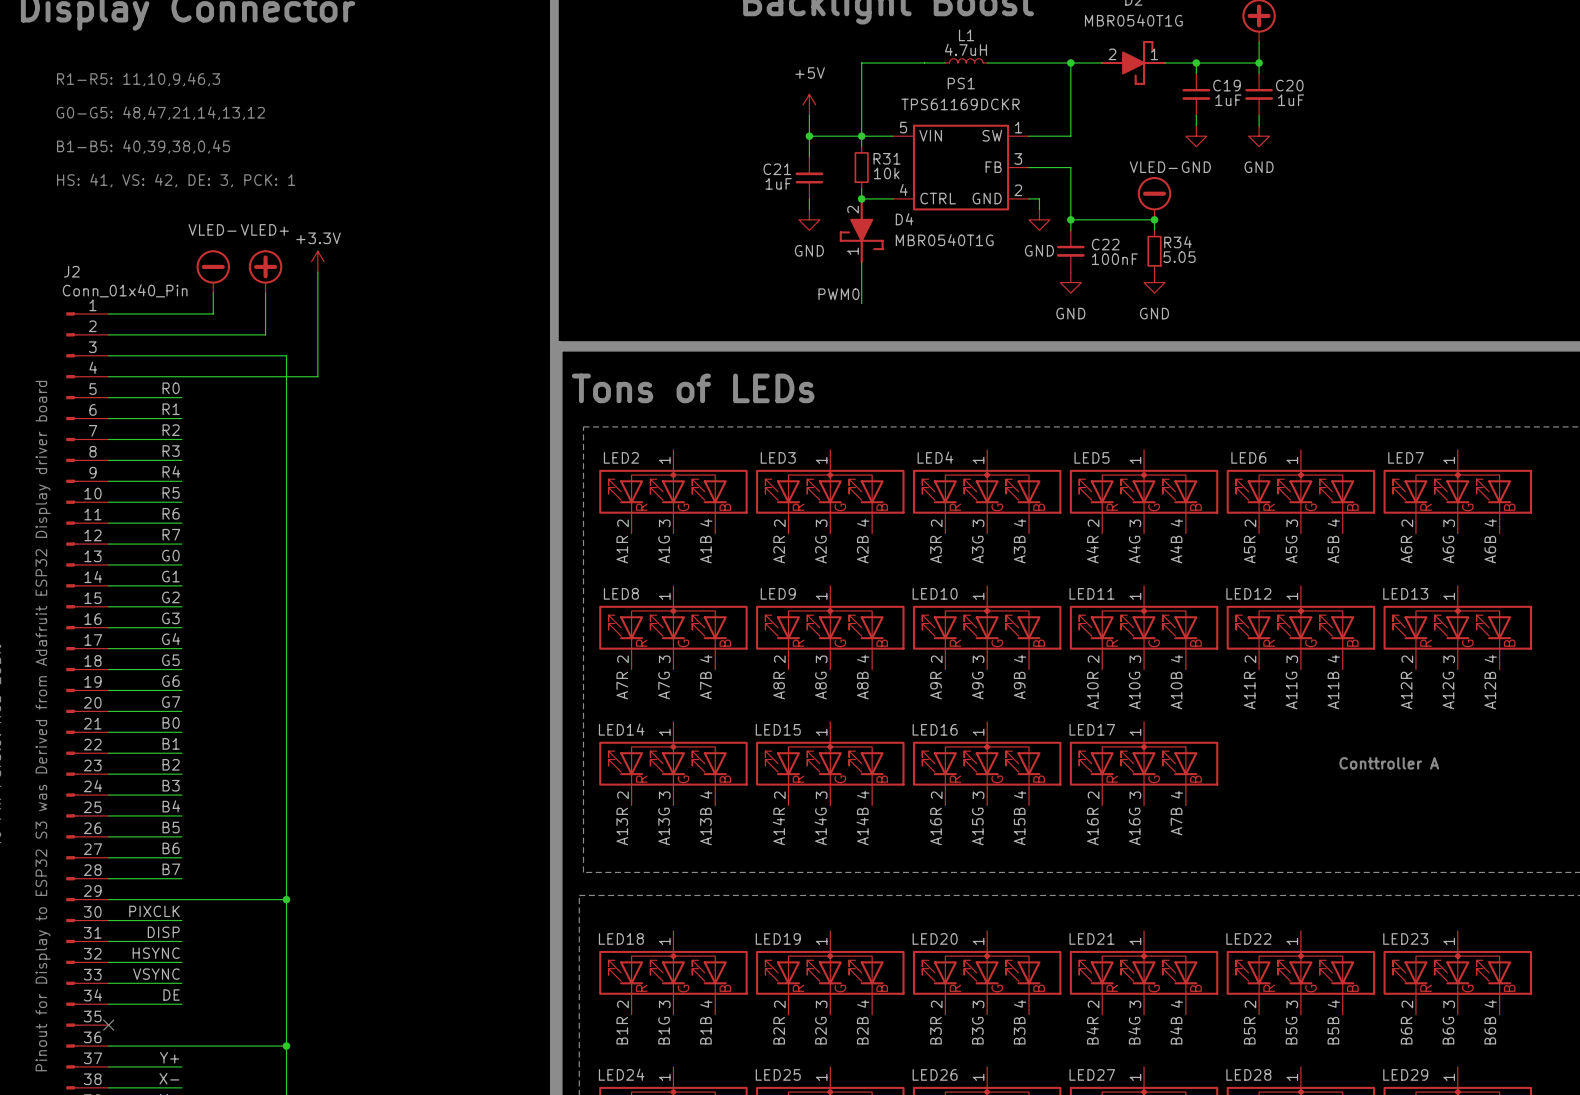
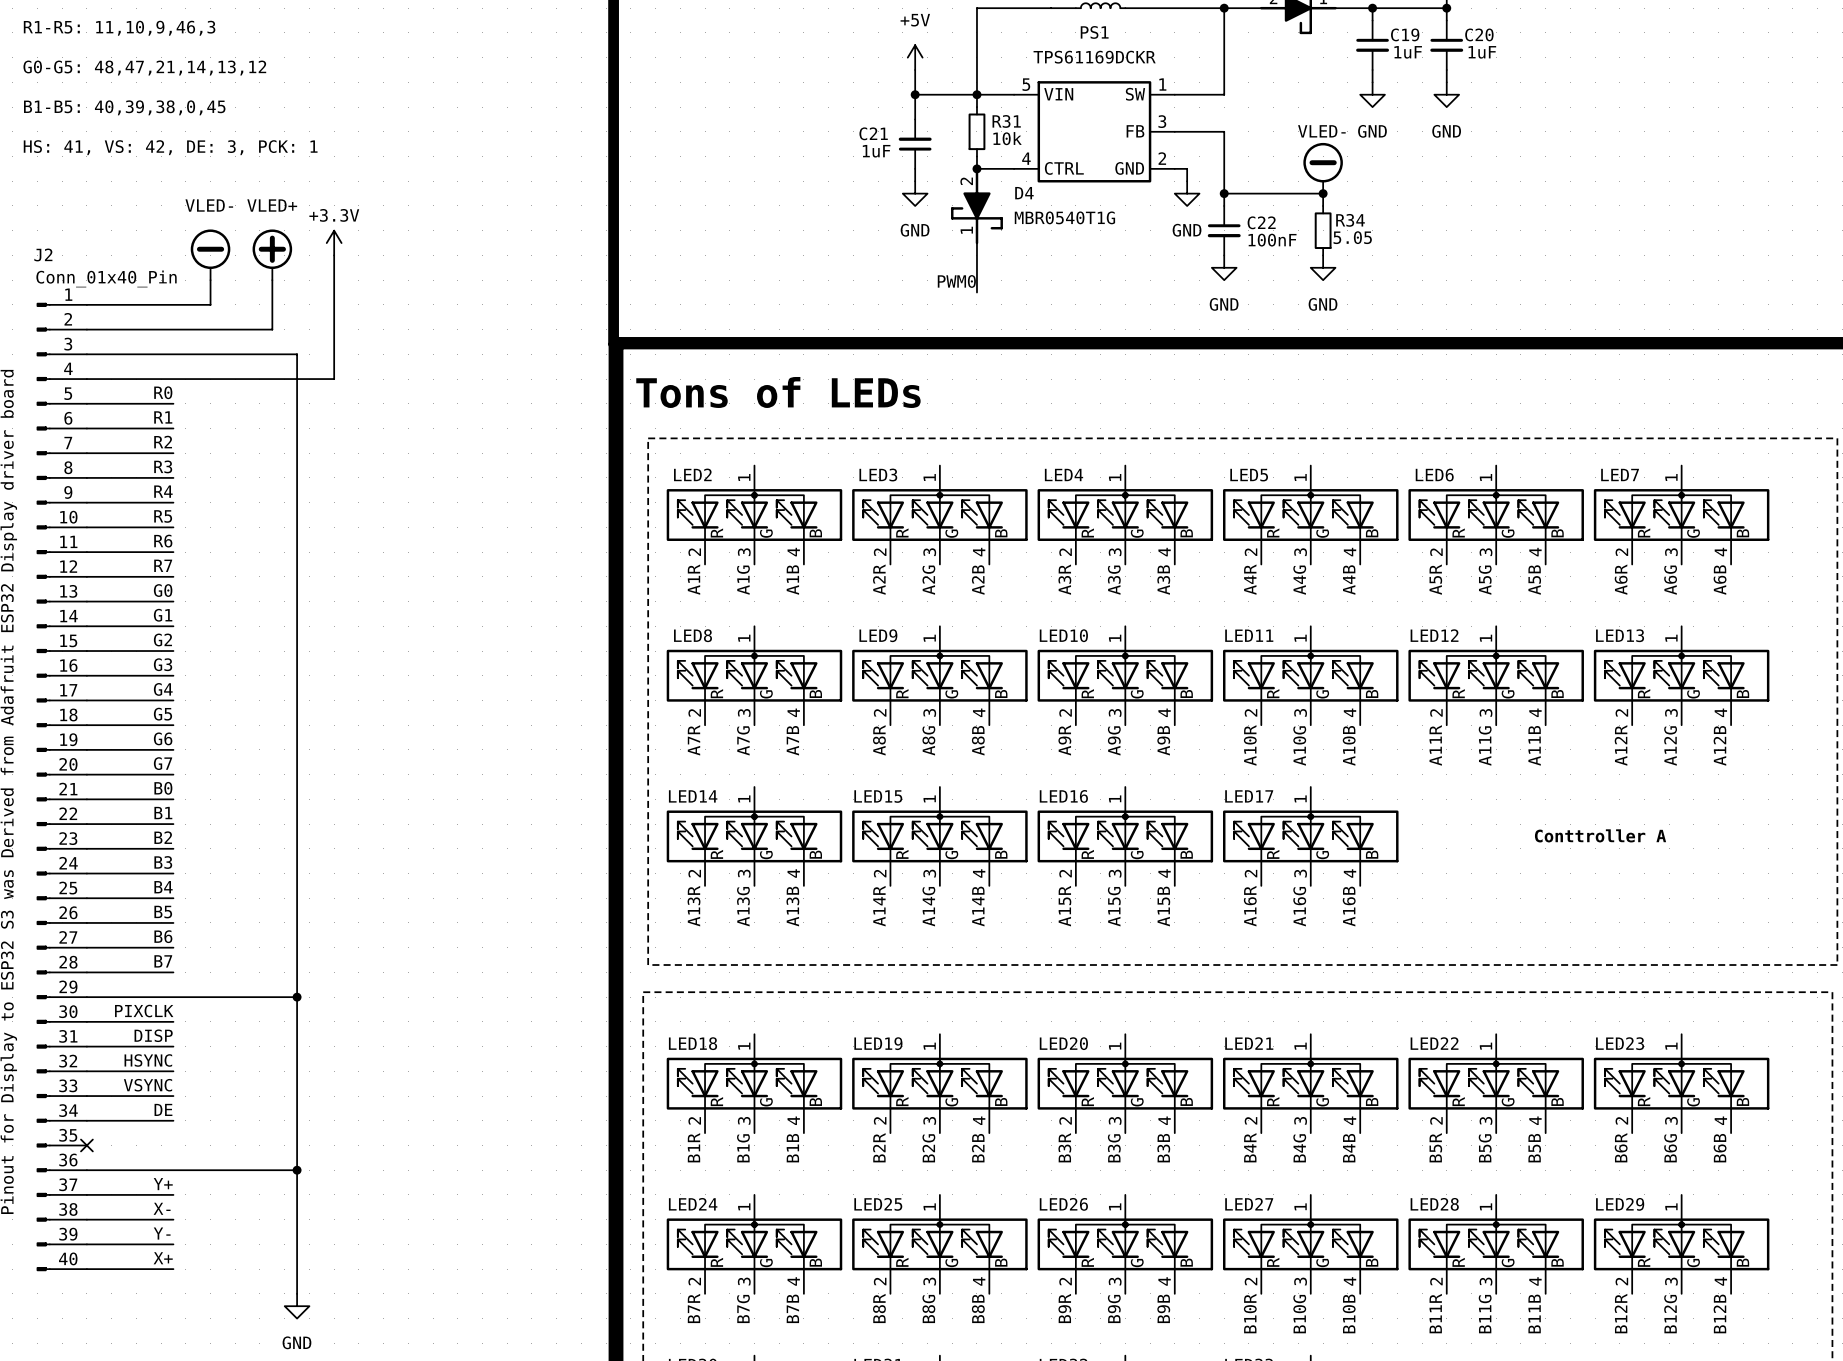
label: A7B (1176, 821) -> A16B (1349, 906)
label: A16R (936, 826) -> A15R (1064, 906)

